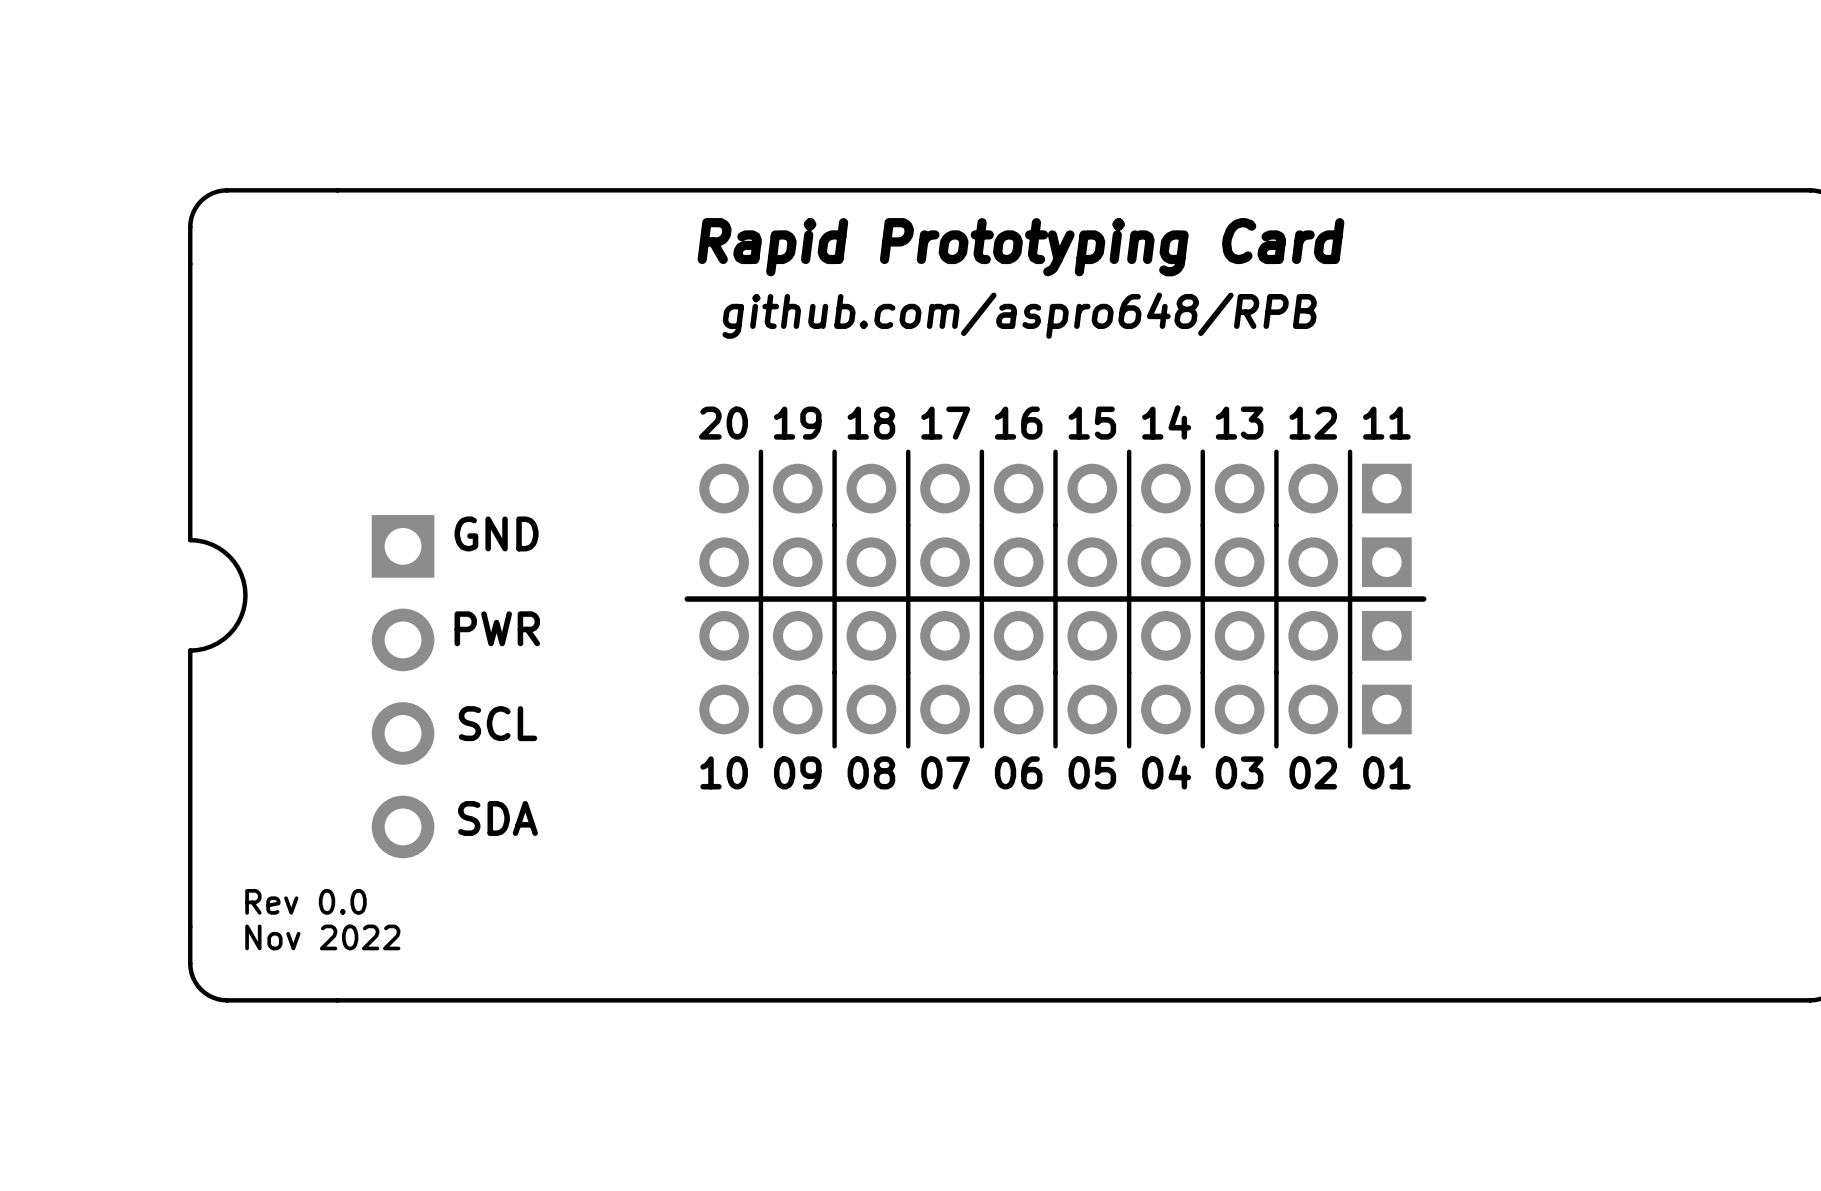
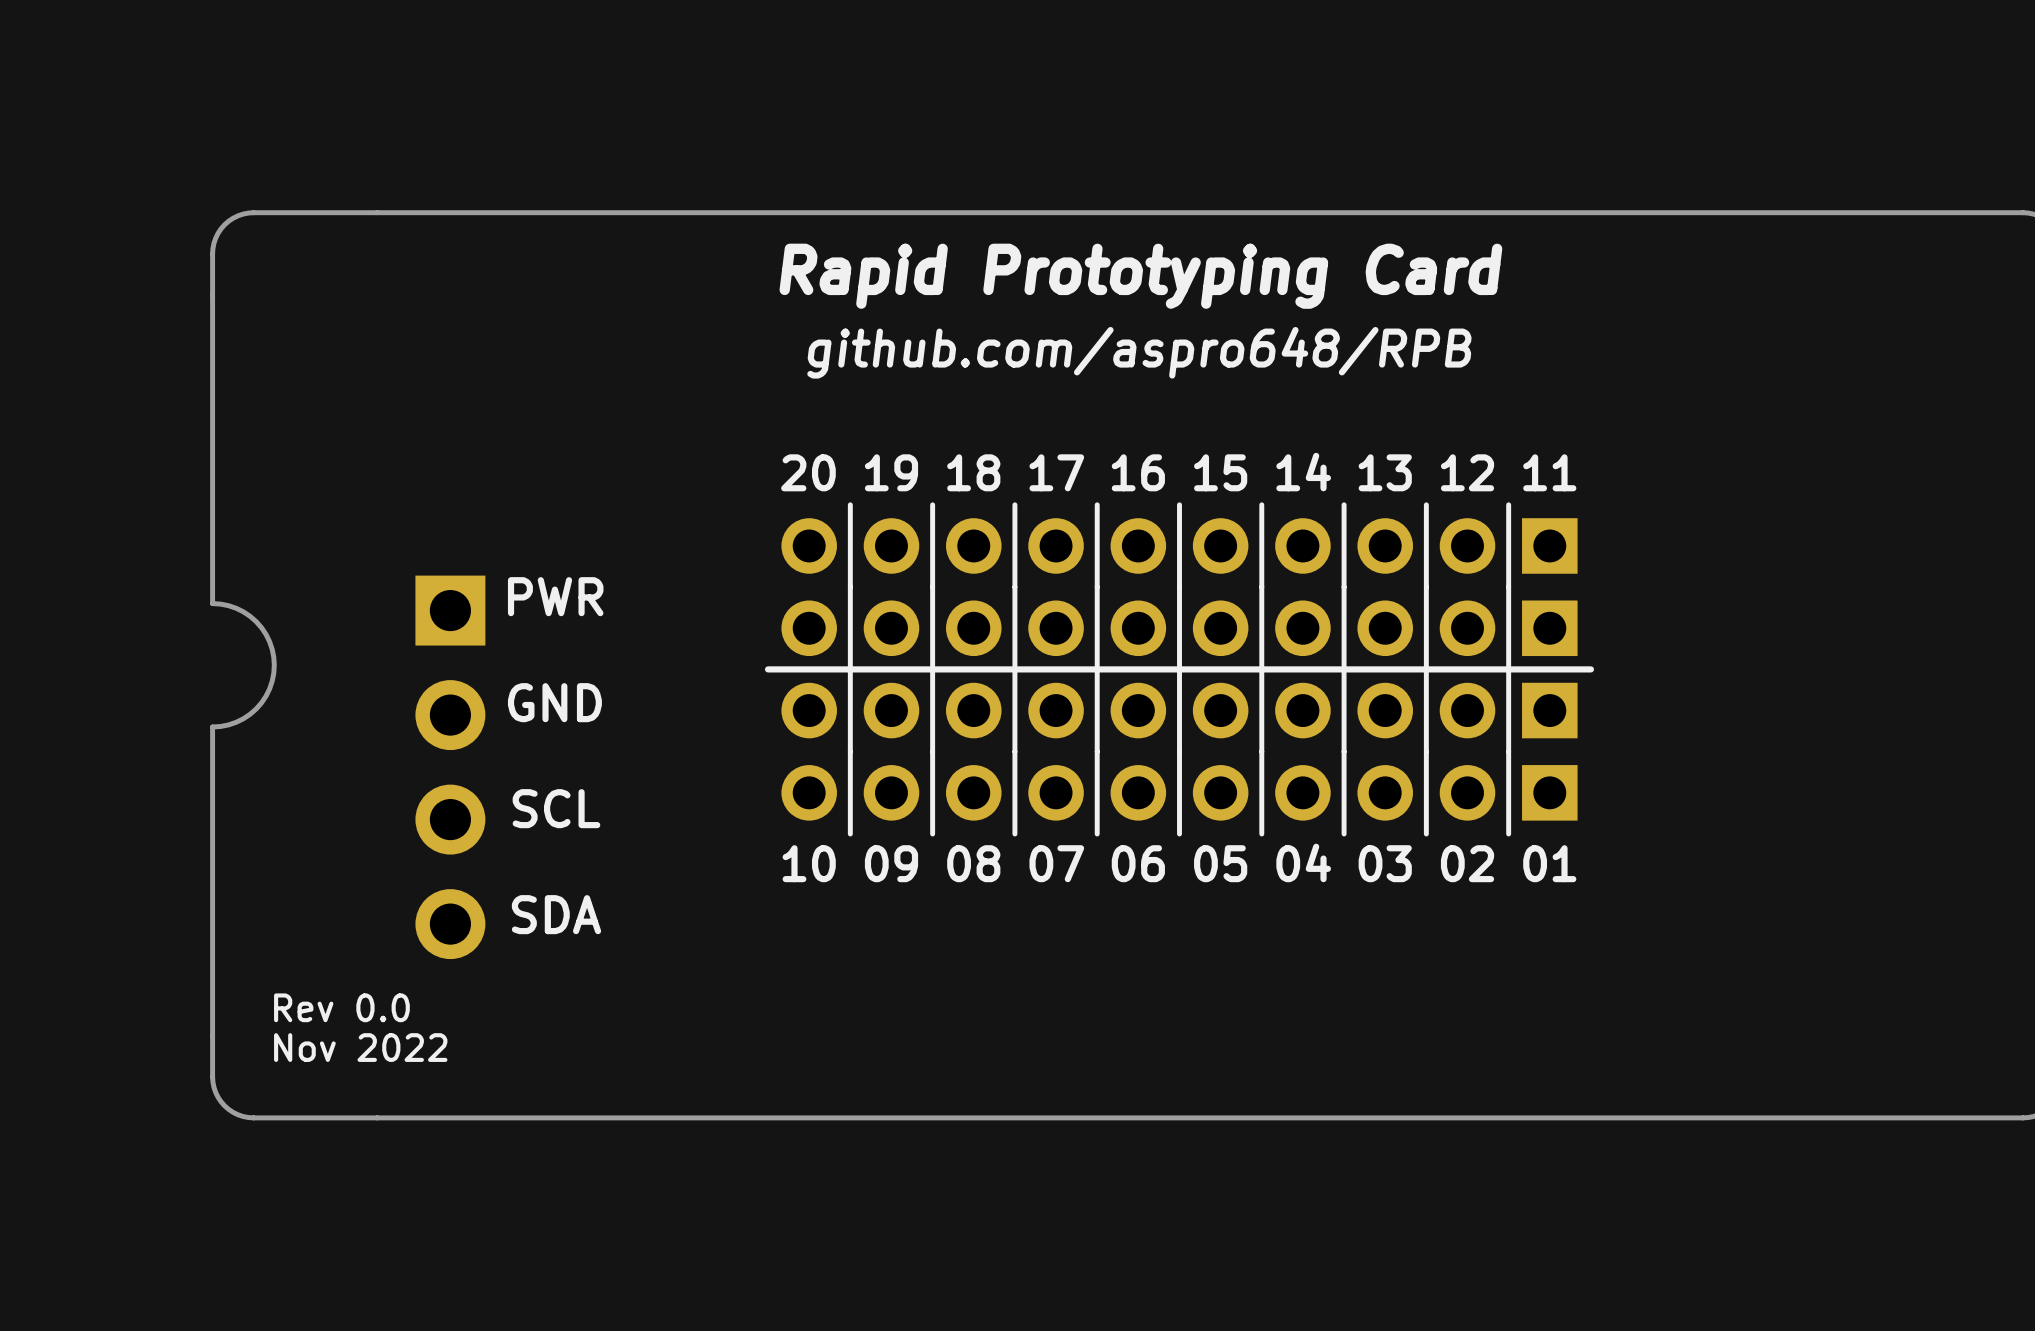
text: GND (496, 533) -> PWR (555, 596)
text: PWR (497, 628) -> GND (554, 702)

